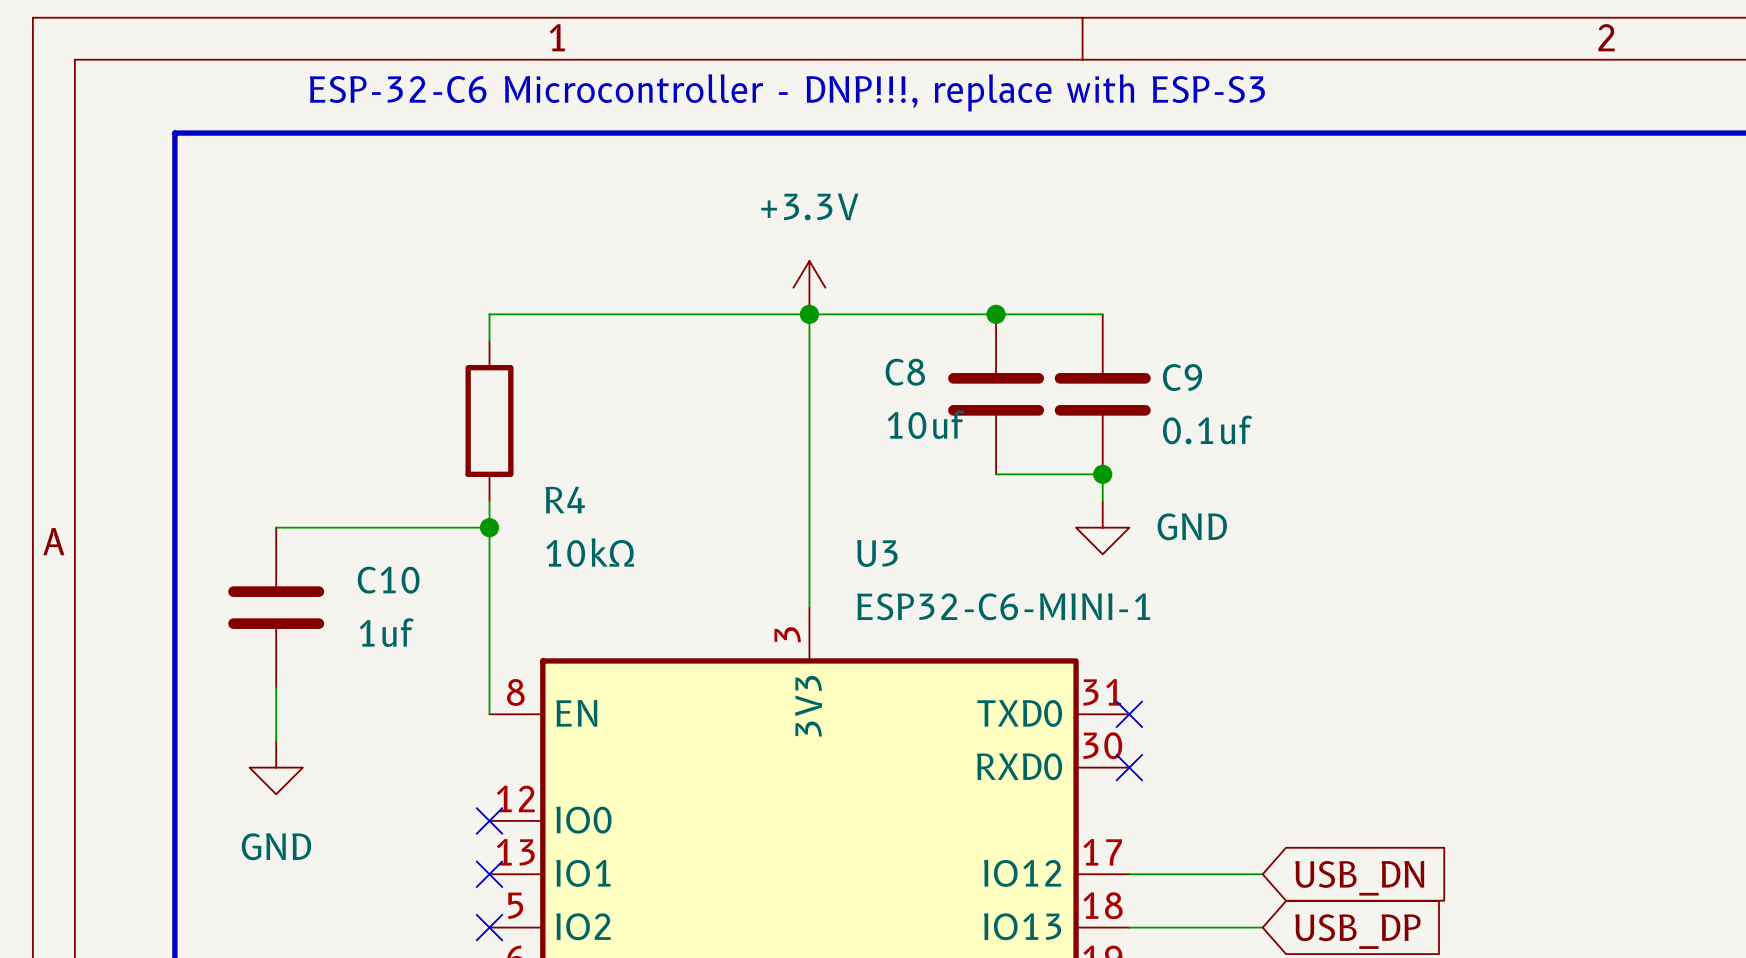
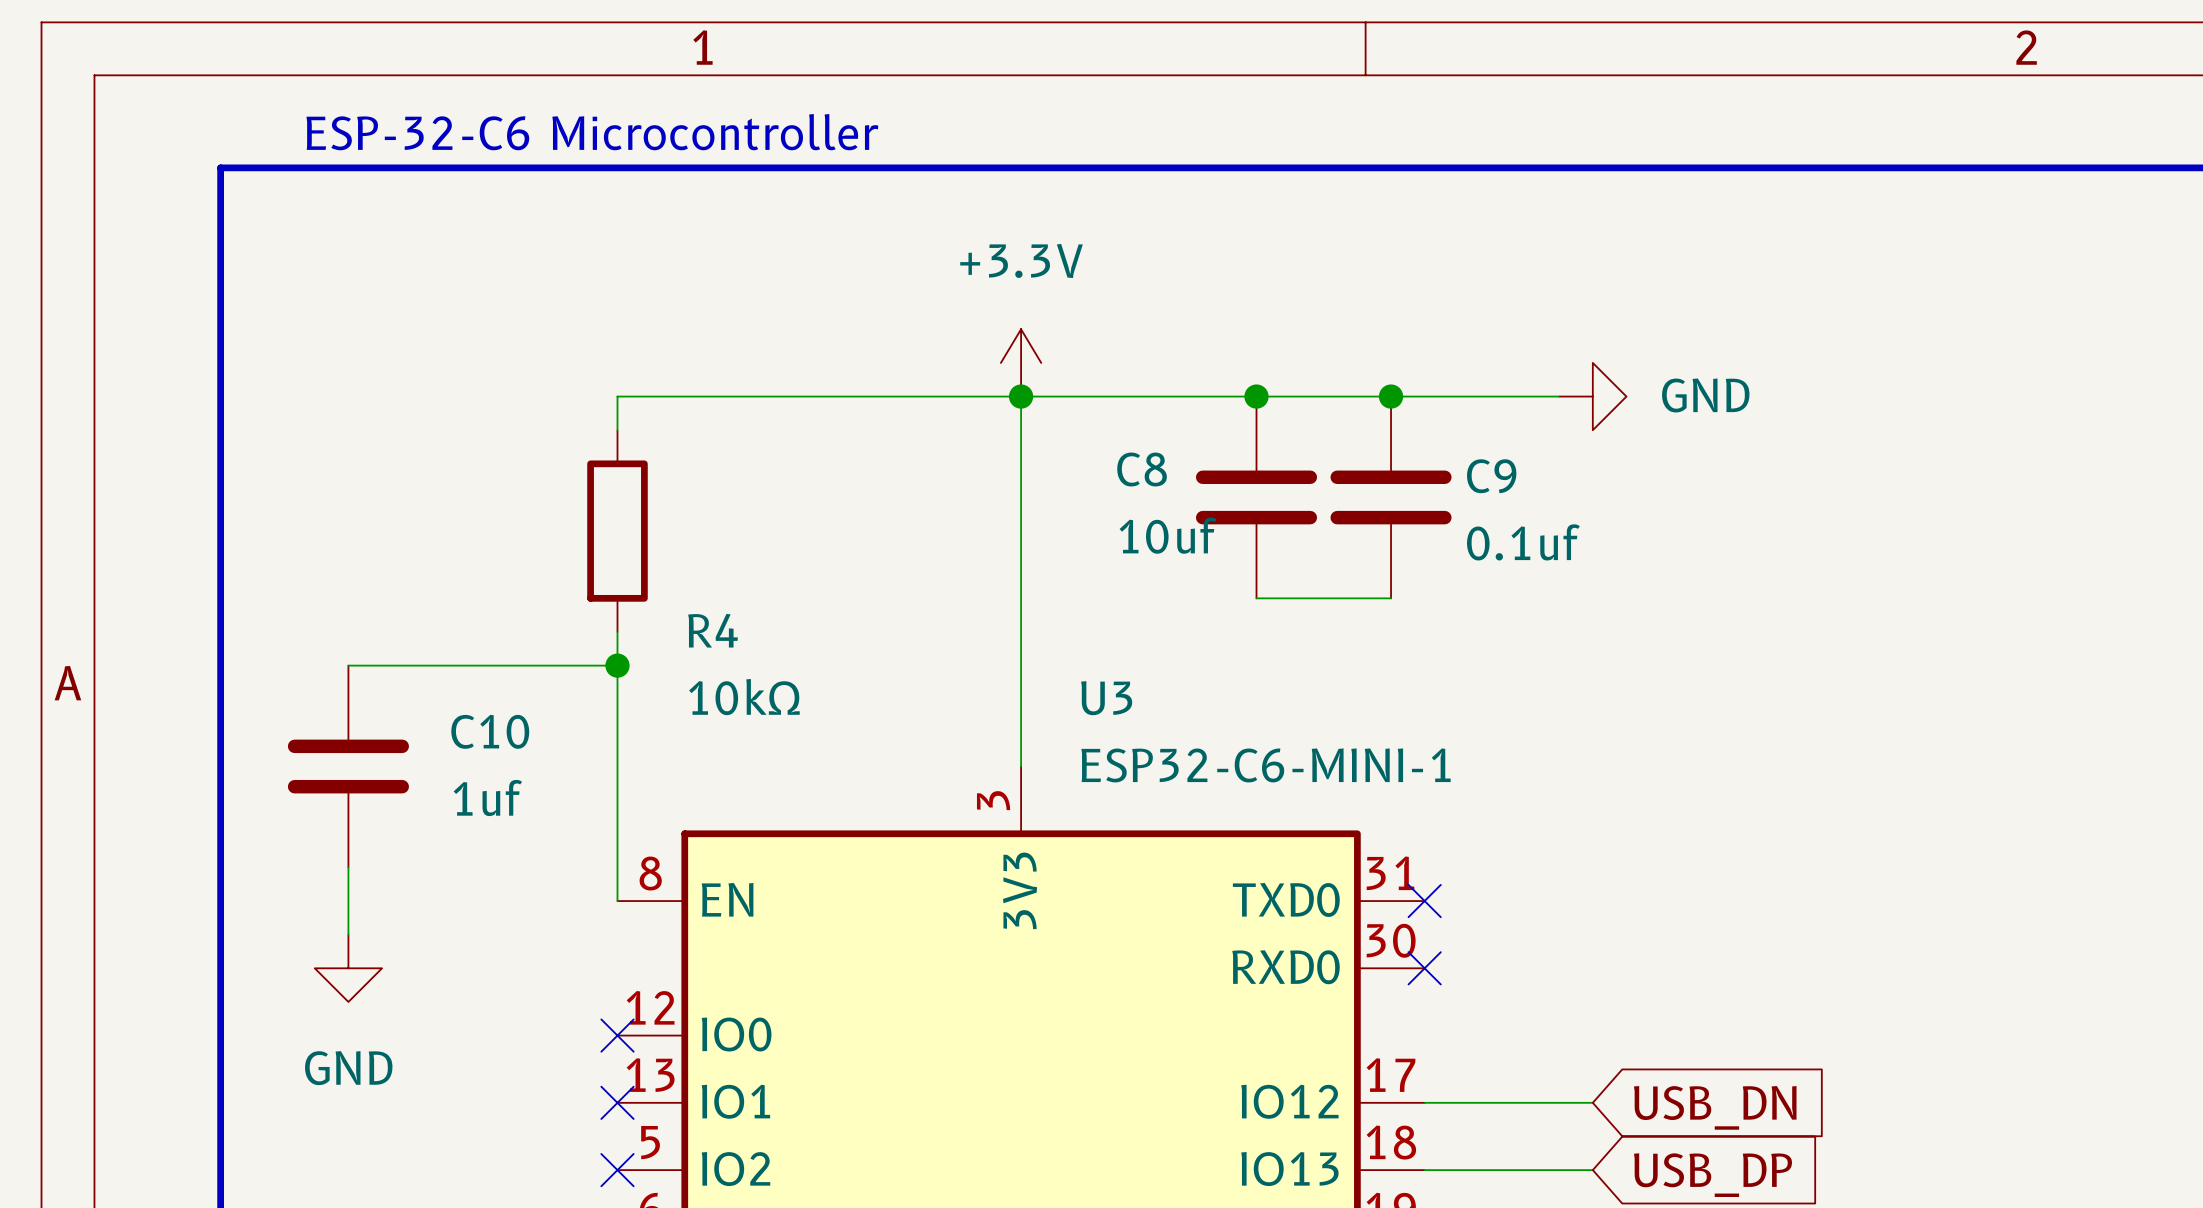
text: ESP-32-C6 Microcontroller - DNP!!!, replace with ESP-S3 (787, 92) -> ESP-32-C6 Microcontroller (592, 132)
wire: none -> (1391, 396) (1559, 396)
junction: none -> (1391, 396)
wire: (1102, 474) (1102, 500) -> none
junction: (1102, 474) -> none
power symbol rotation: 0° (1102, 527) -> 90° counterclockwise (1592, 396)
power symbol position: GND (1102, 527) -> GND (1592, 396)

